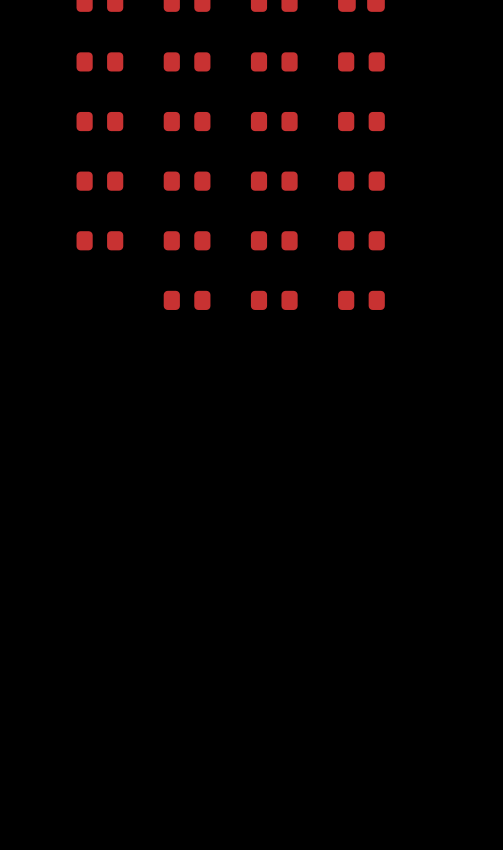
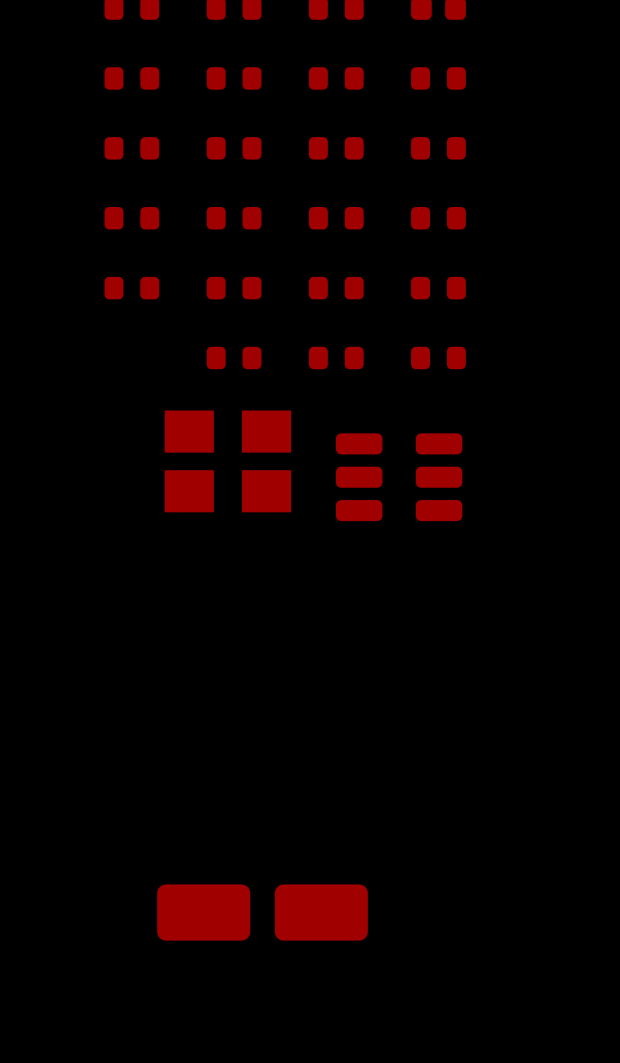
part: none -> (227, 461)
part: none -> (399, 477)
part: none -> (262, 912)

